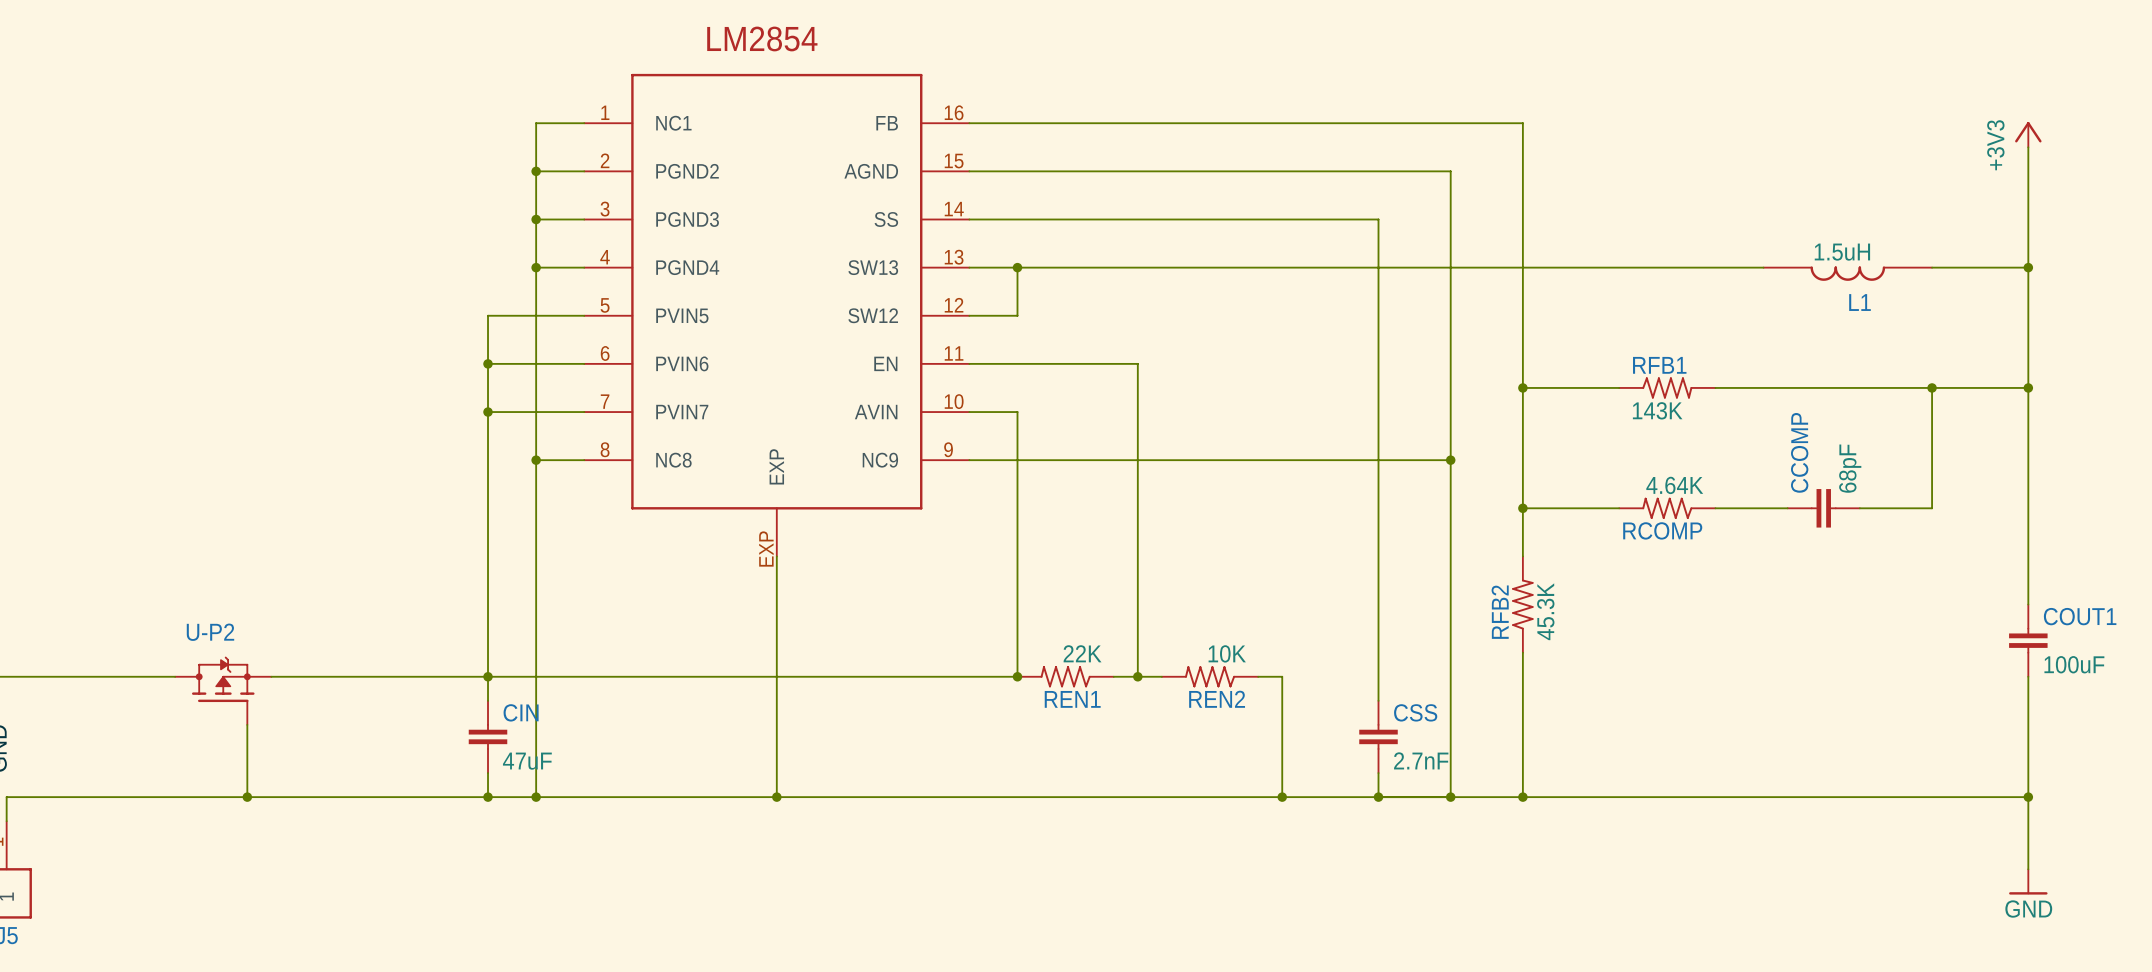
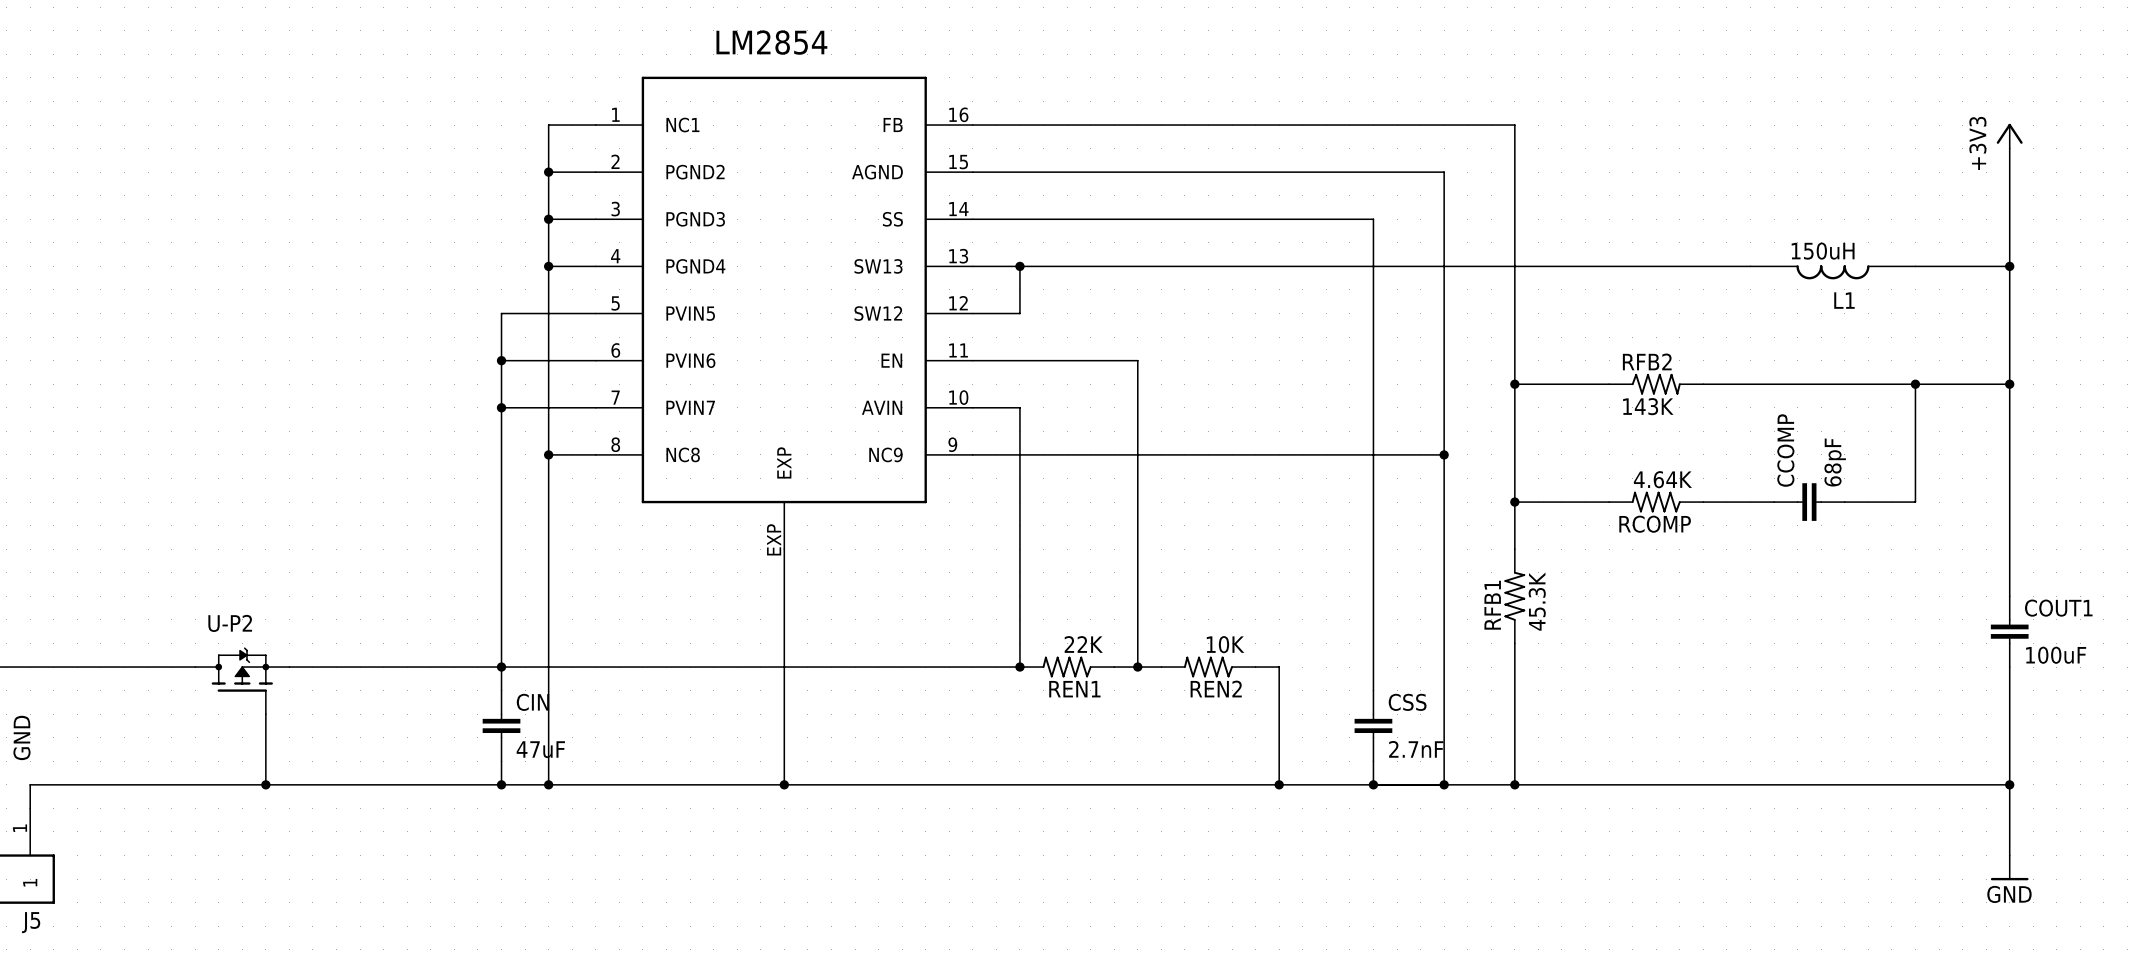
L1 value: 1.5uH (1842, 252) -> 150uH (1823, 251)
RFB1 name: RFB1 (1659, 365) -> RFB2 (1647, 361)
RFB2 name: RFB2 (1500, 612) -> RFB1 (1492, 605)

